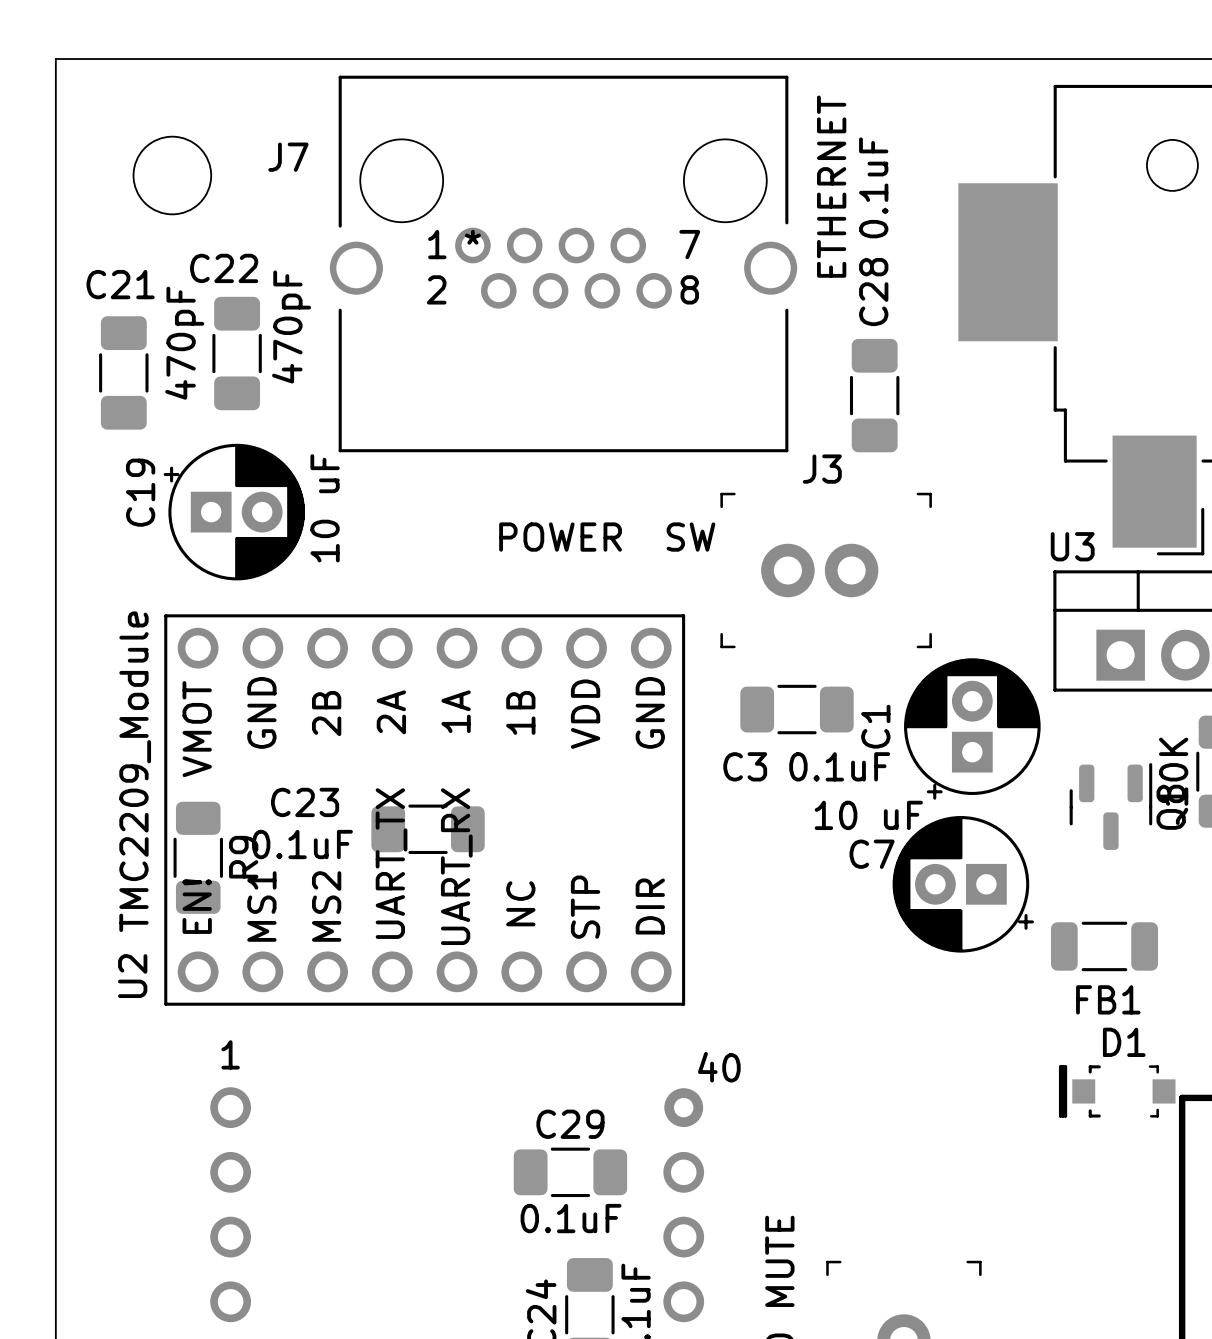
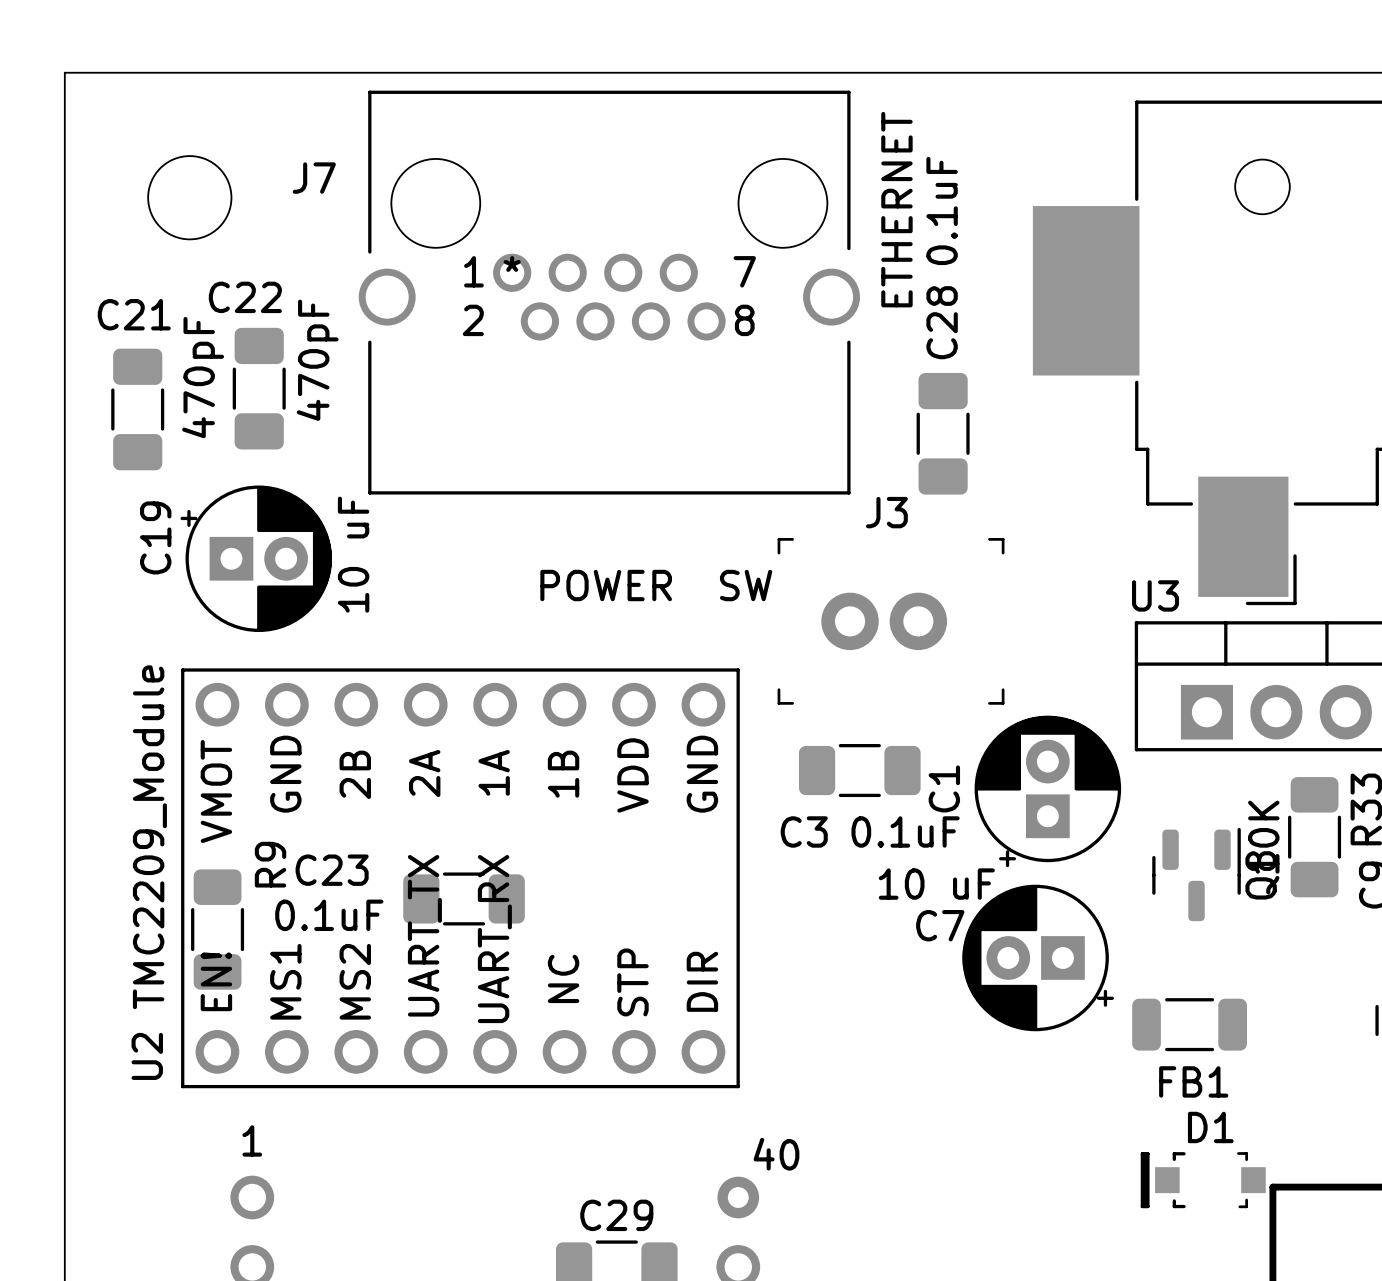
R9 name position: R9 (243, 857) -> R9 (270, 864)

